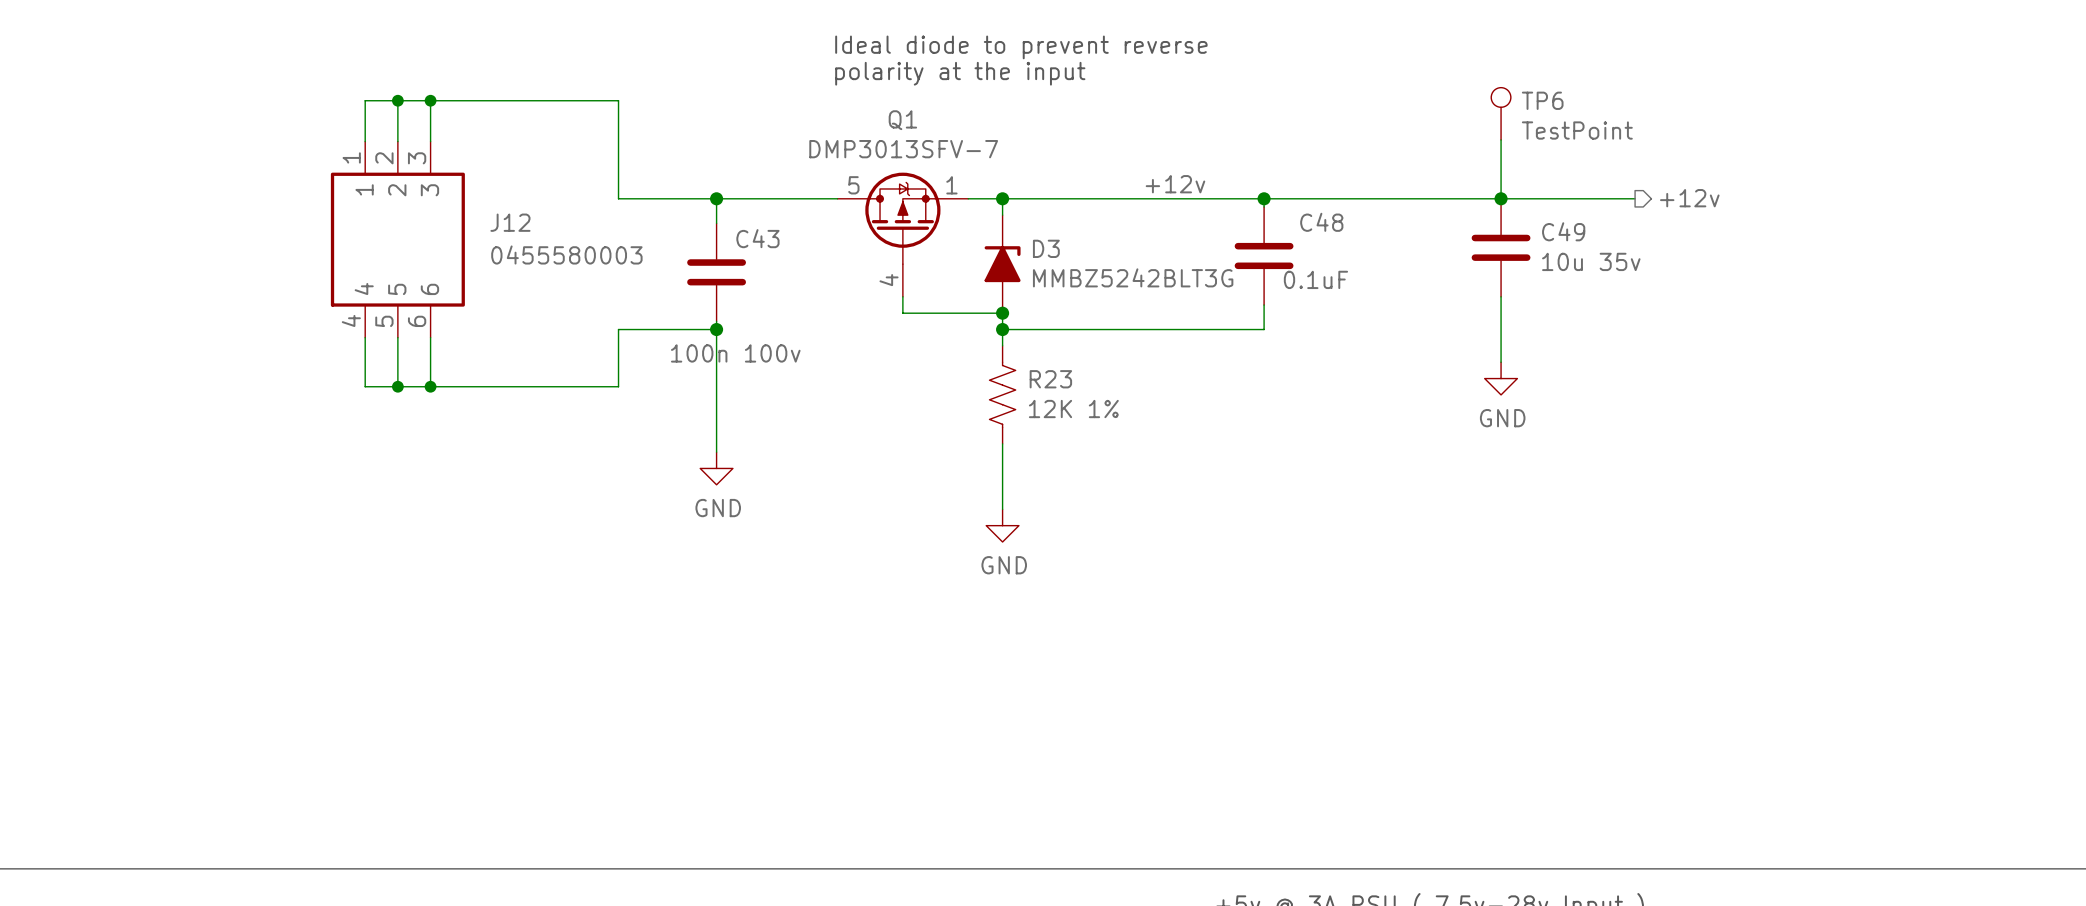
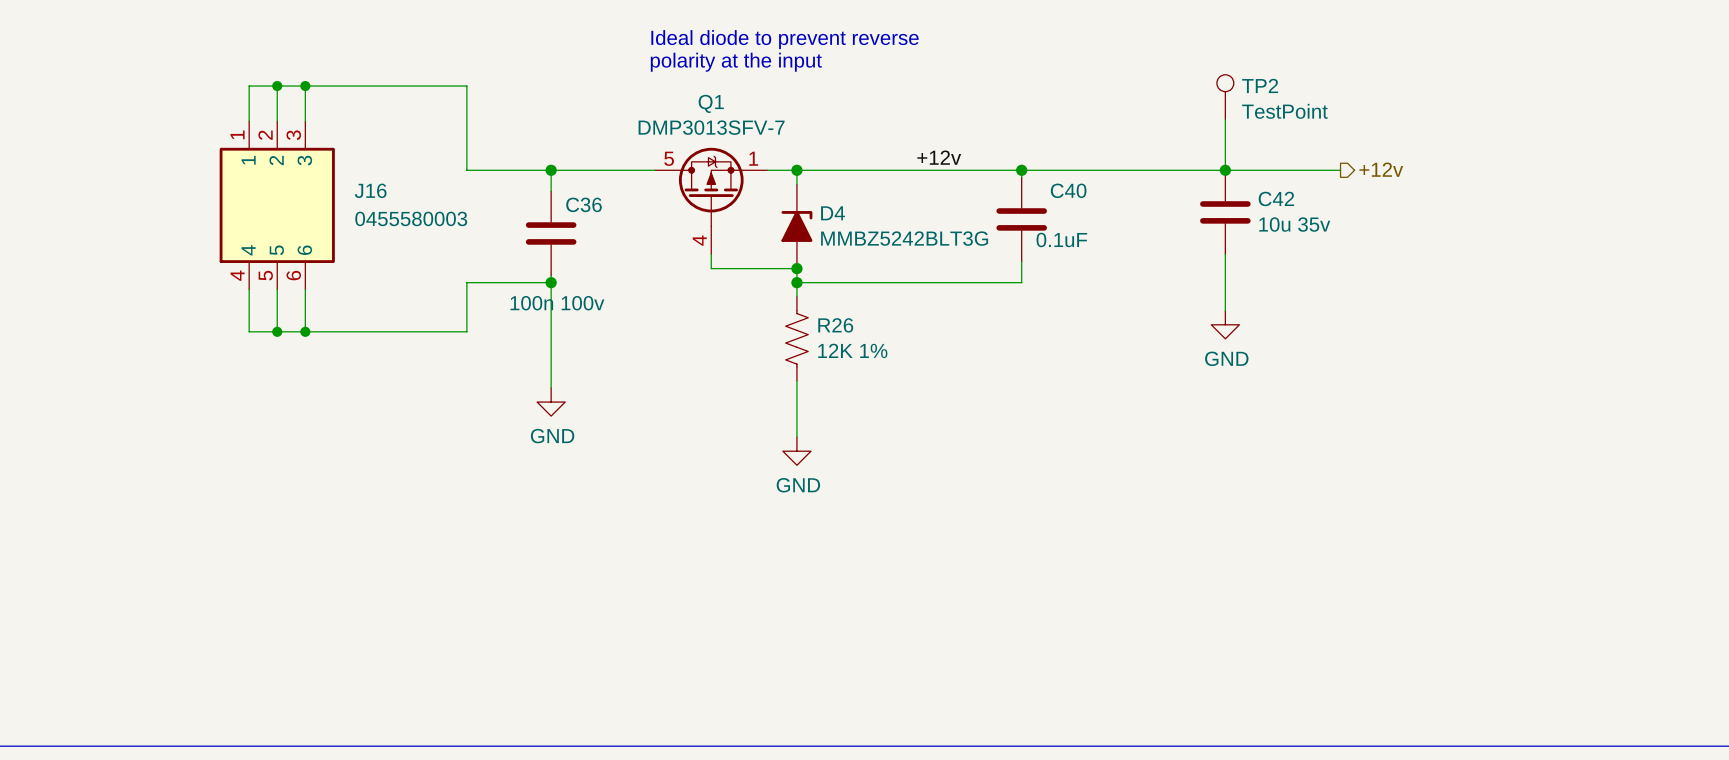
TP6 name: TP6 (1542, 100) -> TP2 (1260, 85)
J12 name: J12 (510, 222) -> J16 (370, 190)
C48 name: C48 (1321, 222) -> C40 (1068, 190)
C49 name: C49 (1563, 231) -> C42 (1276, 198)
C43 name: C43 (757, 238) -> C36 (583, 204)
D3 name: D3 (1046, 248) -> D4 (833, 213)
R23 name: R23 (1050, 379) -> R26 (835, 325)

